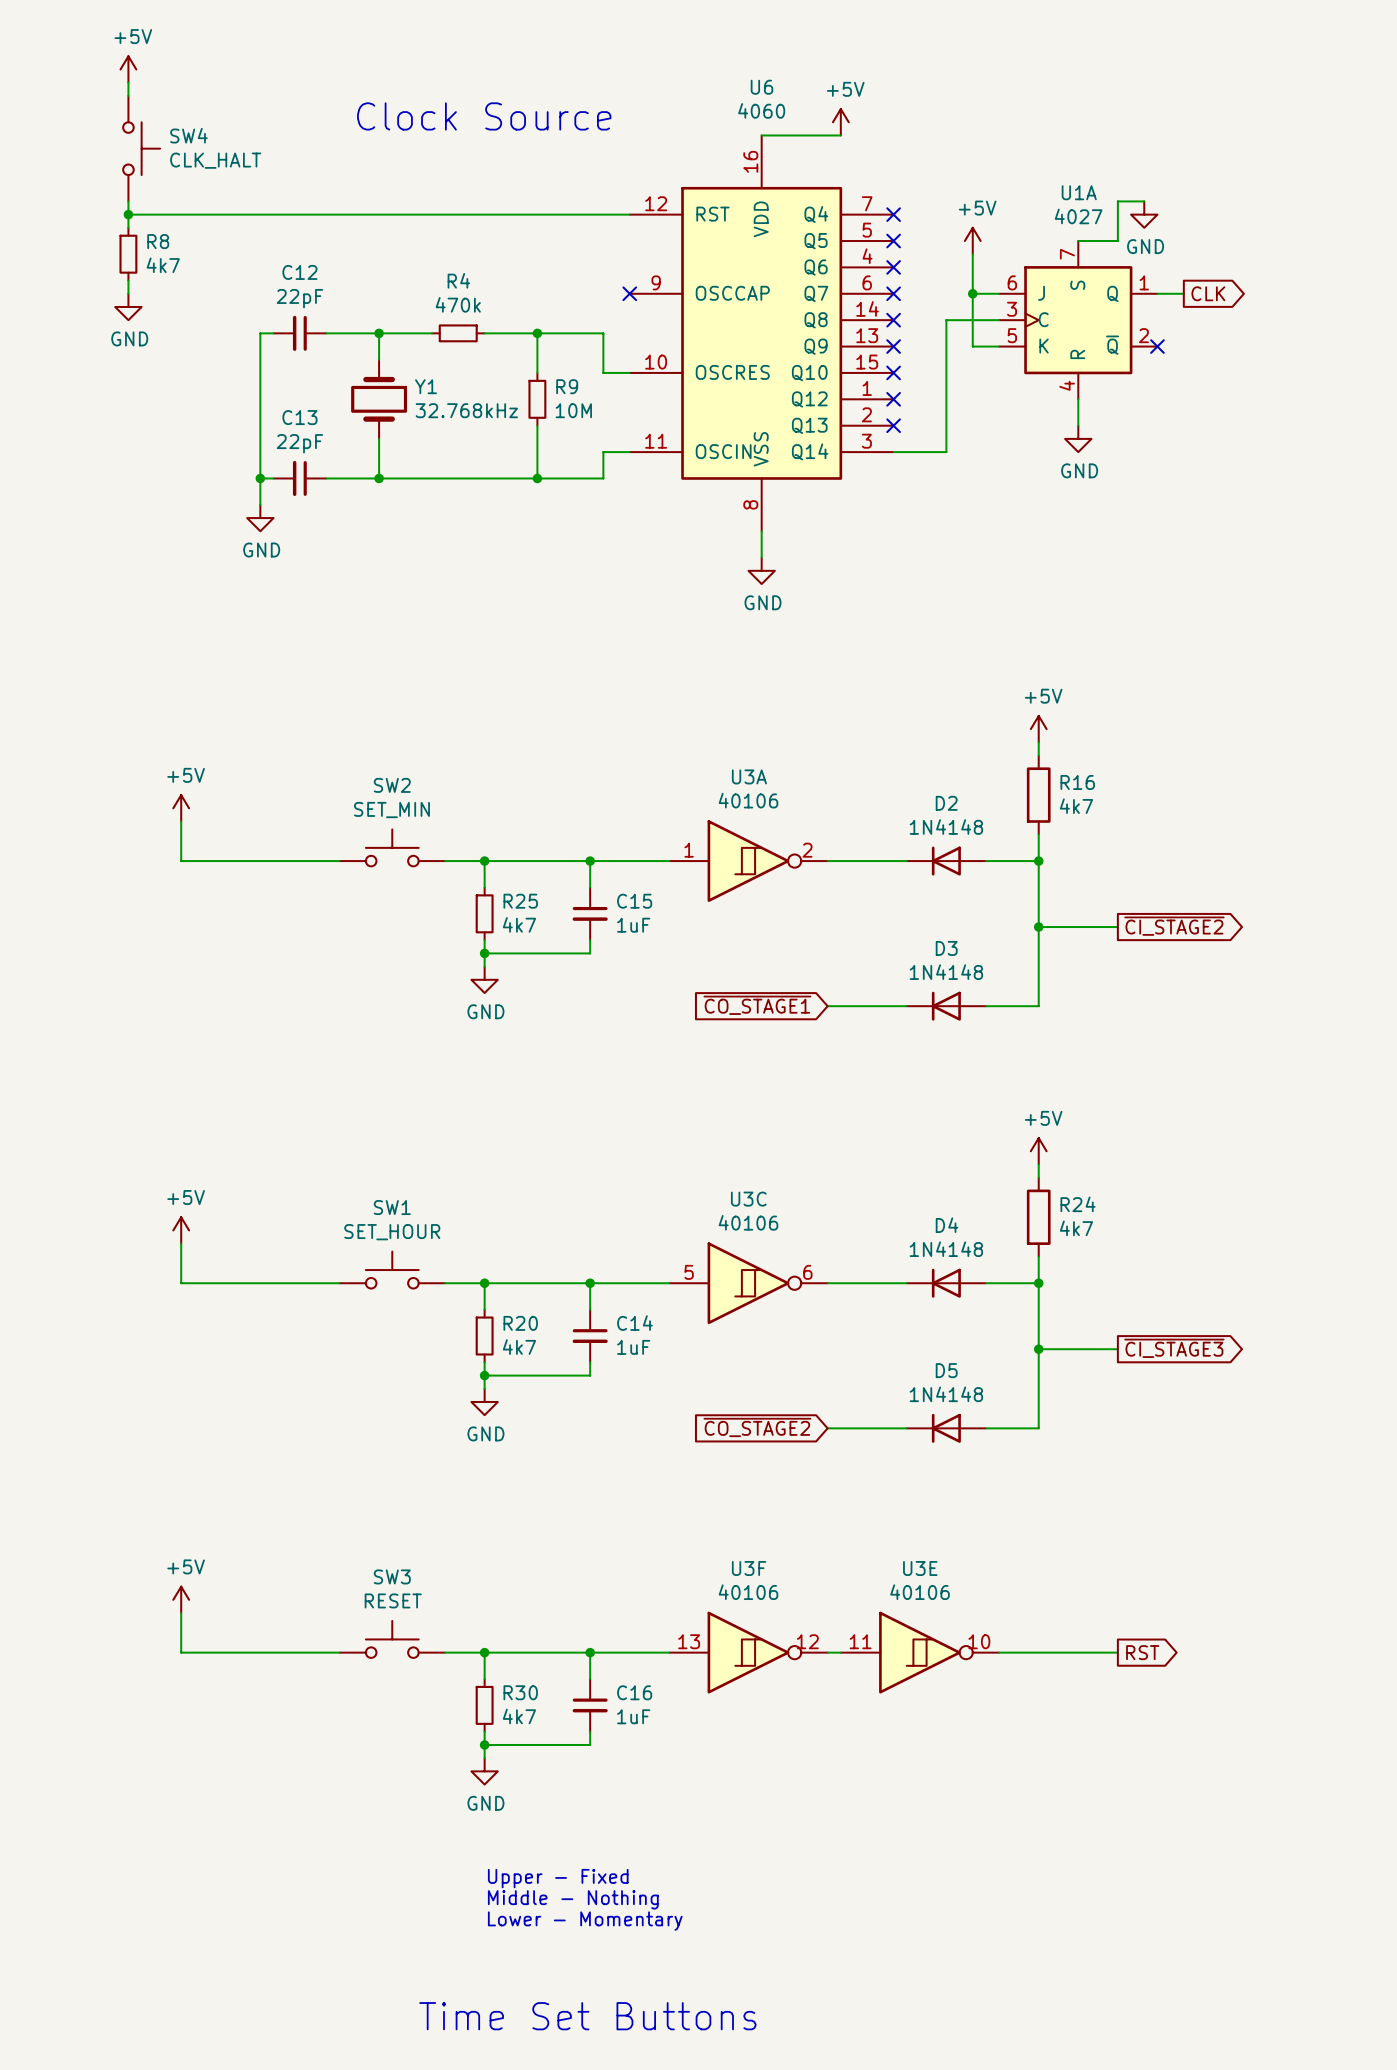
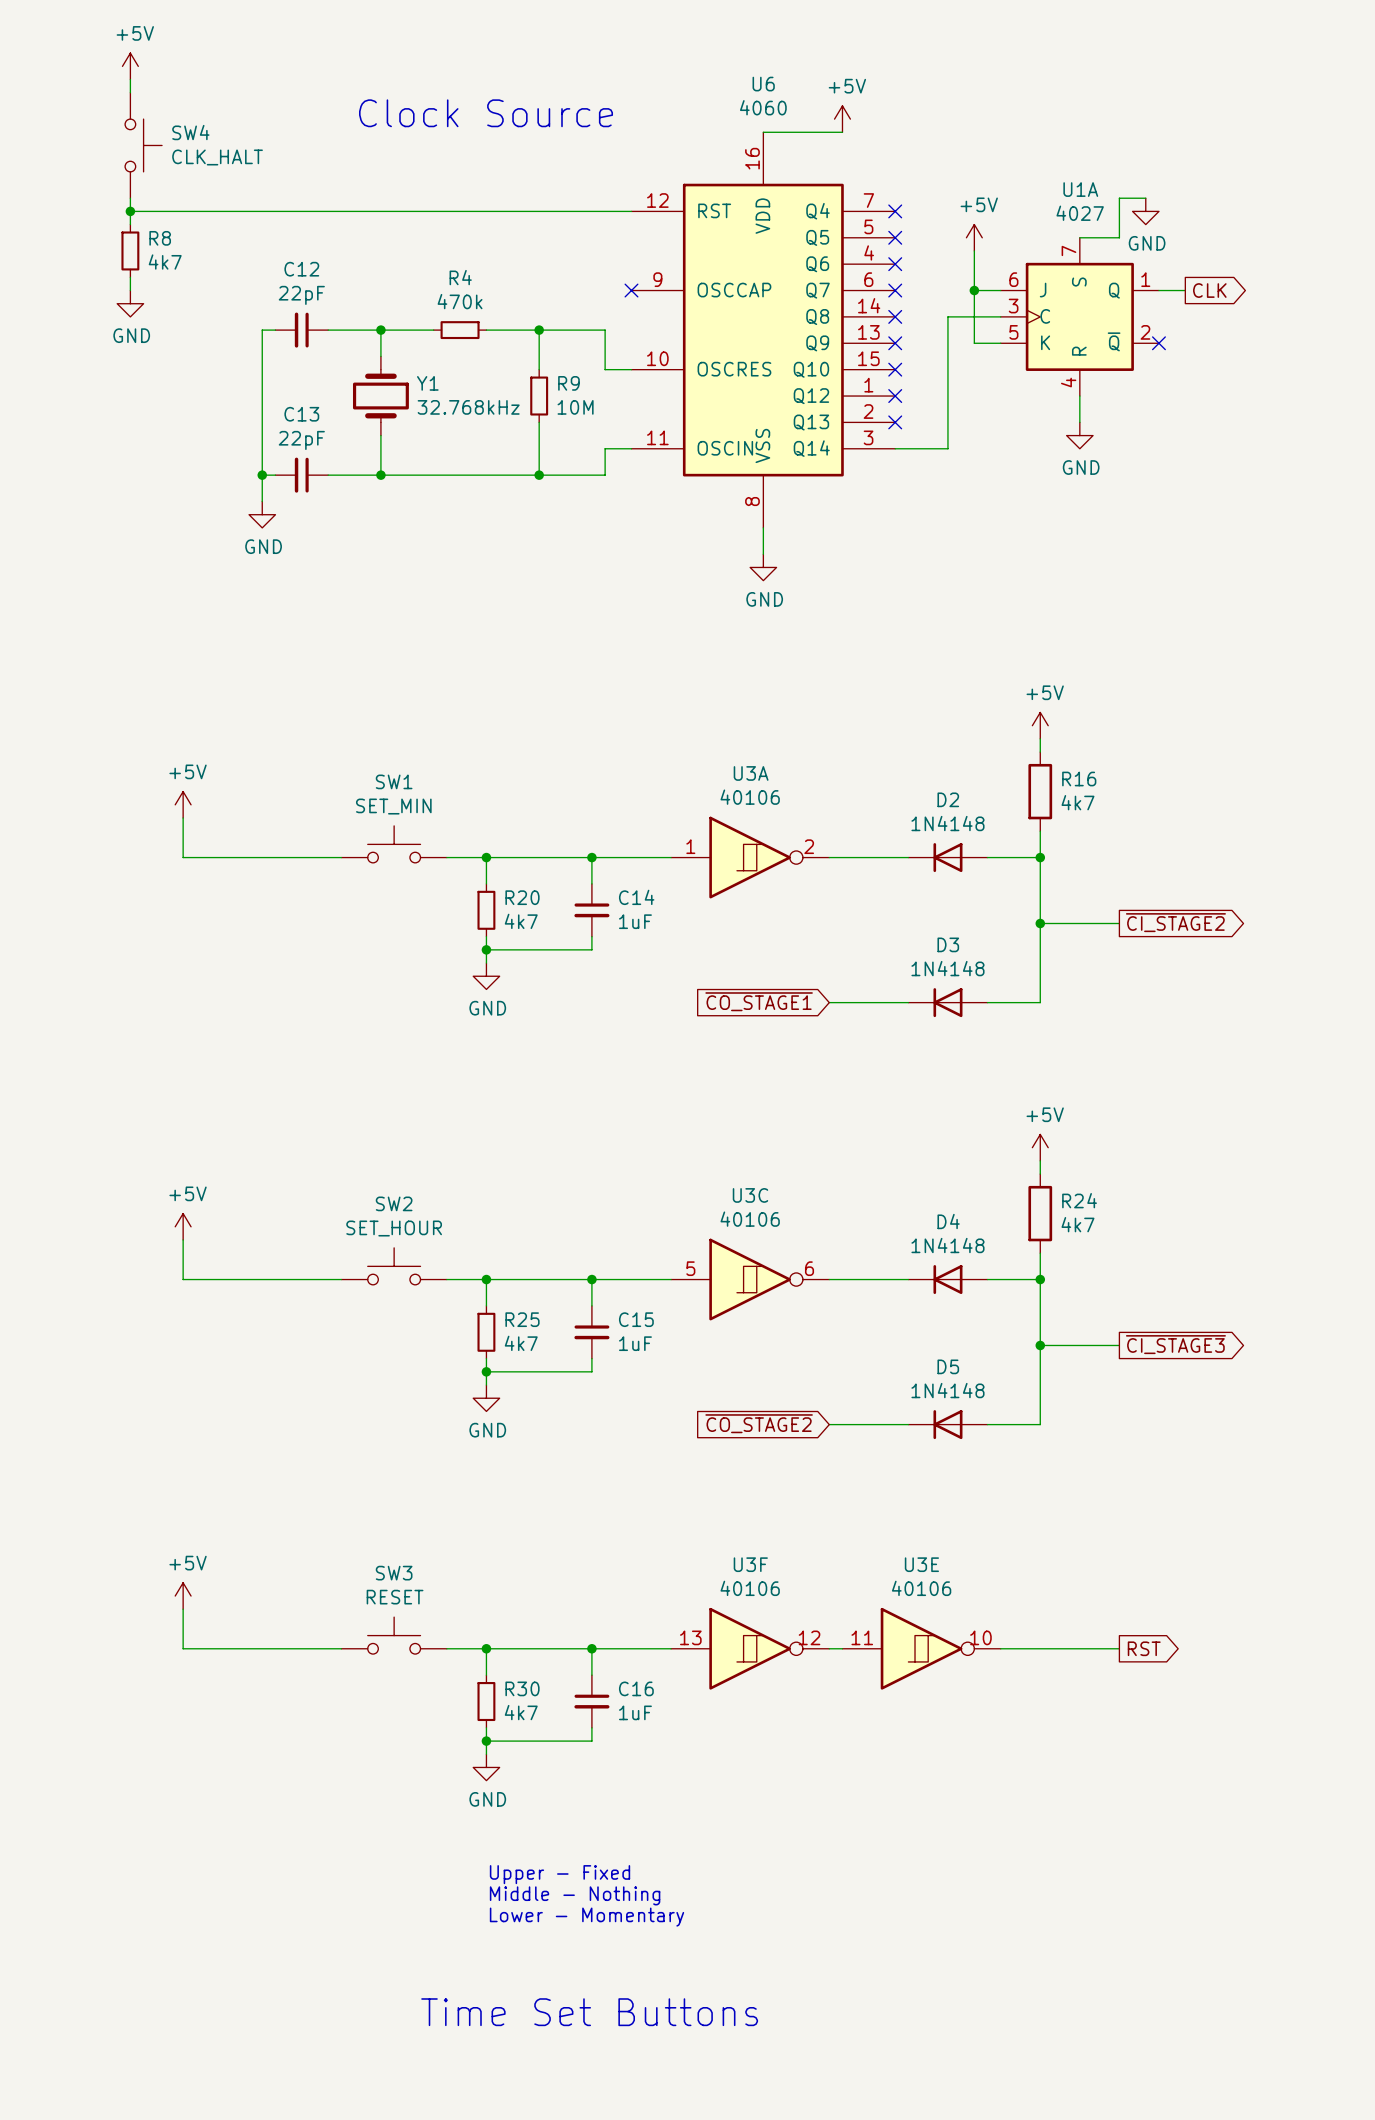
SW2 name: SW2 (392, 785) -> SW1 (394, 781)
R25 name: R25 (520, 901) -> R20 (522, 897)
C15 name: C15 (634, 901) -> C14 (636, 897)
SW1 name: SW1 (392, 1207) -> SW2 (394, 1203)
R20 name: R20 (520, 1323) -> R25 (522, 1319)
C14 name: C14 (634, 1323) -> C15 (636, 1319)

